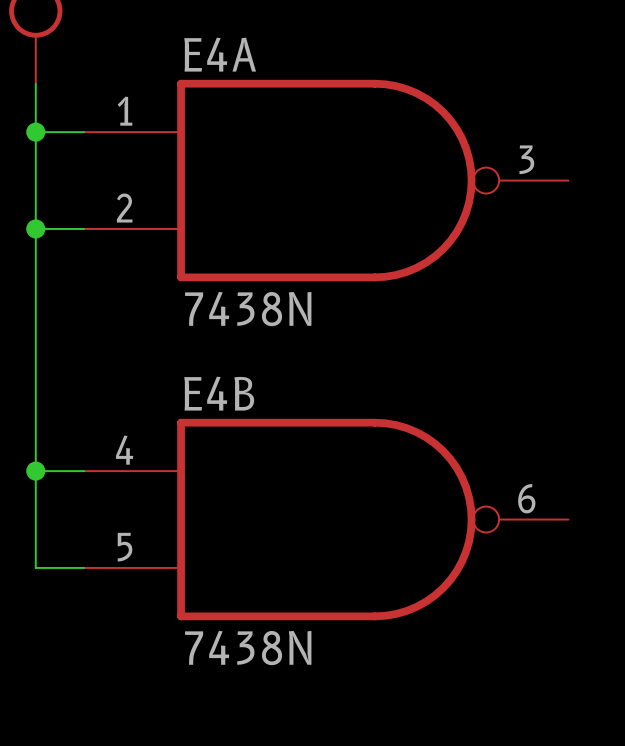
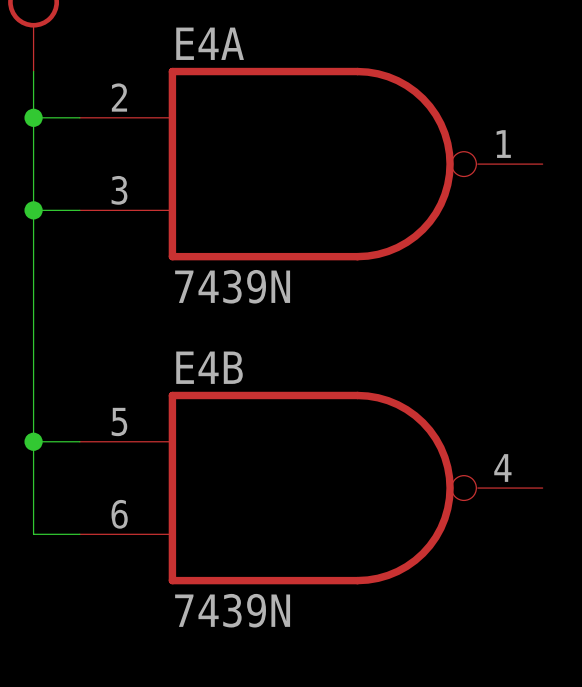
E4A pin number: 1 (125, 111) -> 2 (119, 97)
E4A pin number: 3 (526, 159) -> 1 (503, 144)
E4A pin number: 2 (124, 208) -> 3 (119, 190)
E4A value: 7438N (248, 309) -> 7439N (232, 286)
E4B pin number: 4 (124, 450) -> 5 (119, 421)
E4B pin number: 6 (526, 498) -> 4 (502, 468)
E4B pin number: 5 (125, 547) -> 6 (119, 514)
E4B value: 7438N (248, 648) -> 7439N (232, 610)

